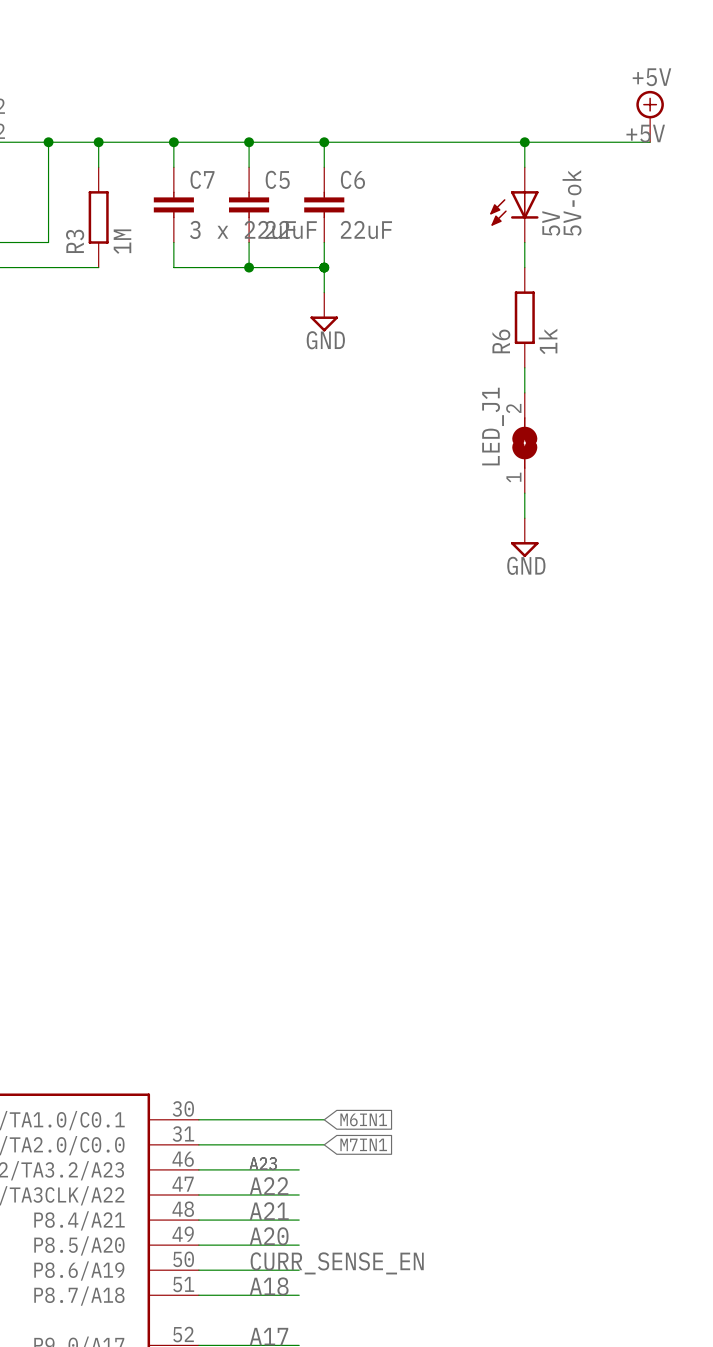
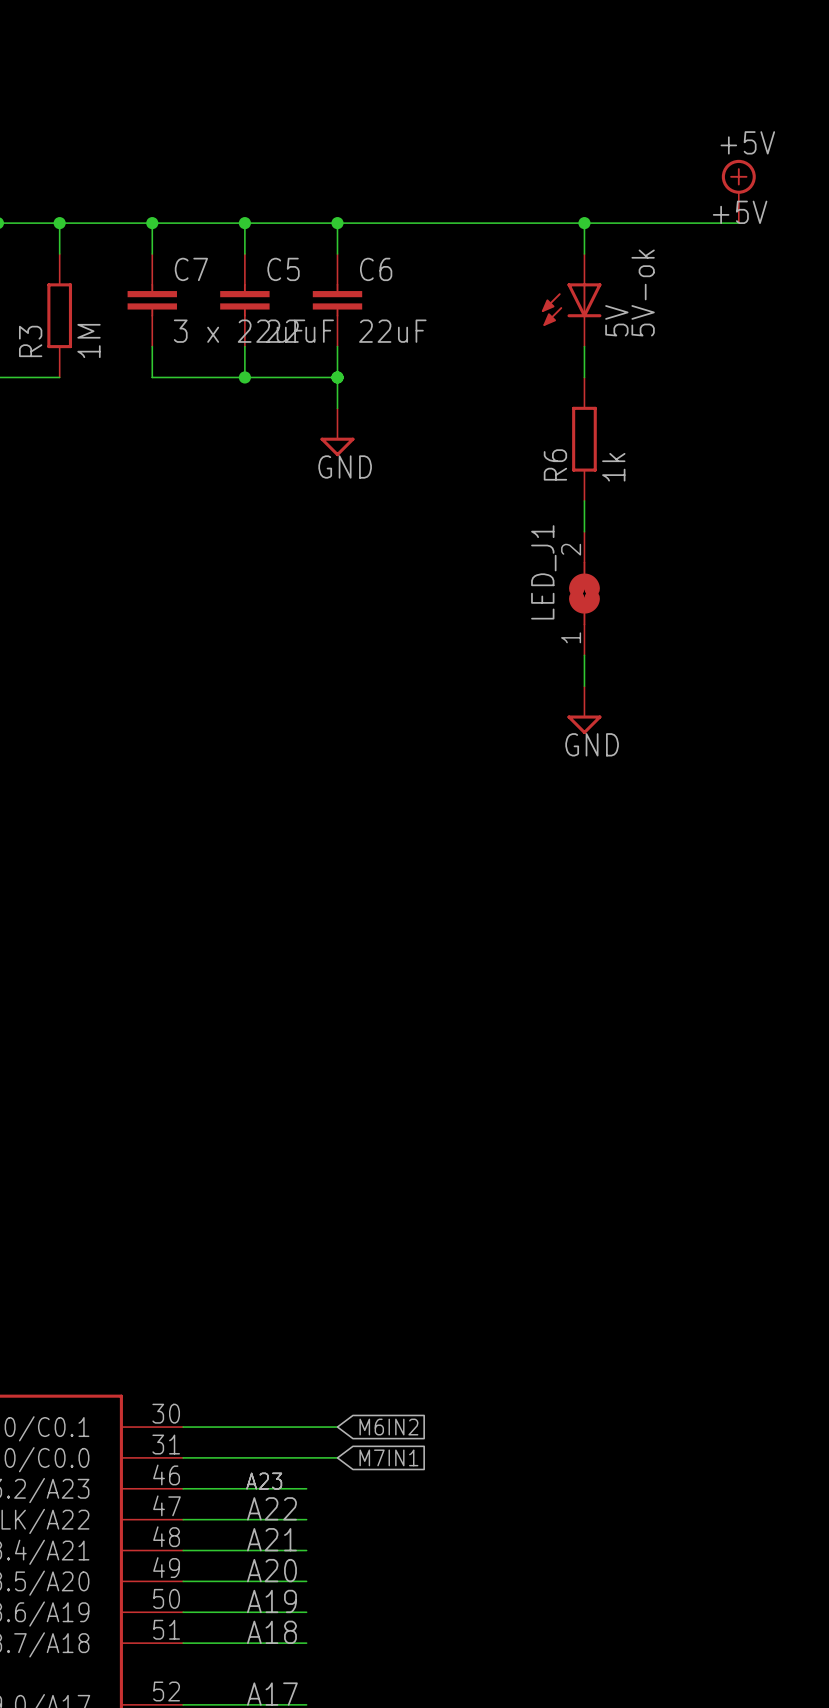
global label: M6IN1 (363, 1119) -> M6IN2 (388, 1427)
label: CURR_SENSE_EN (337, 1263) -> A19 (271, 1601)

